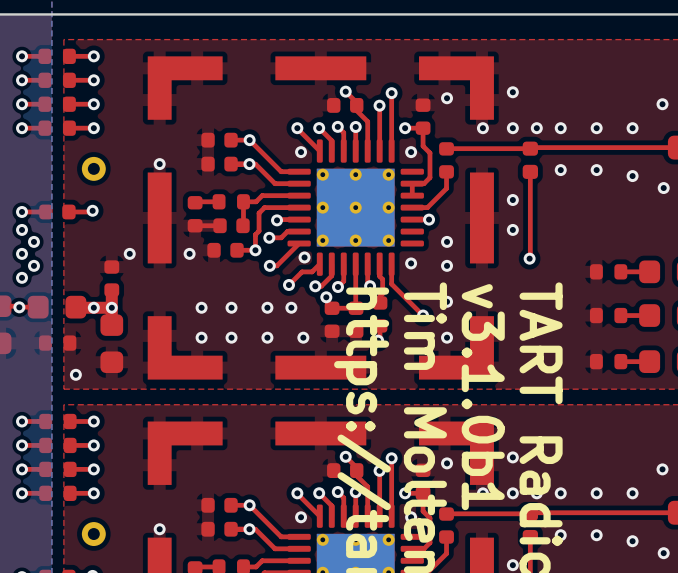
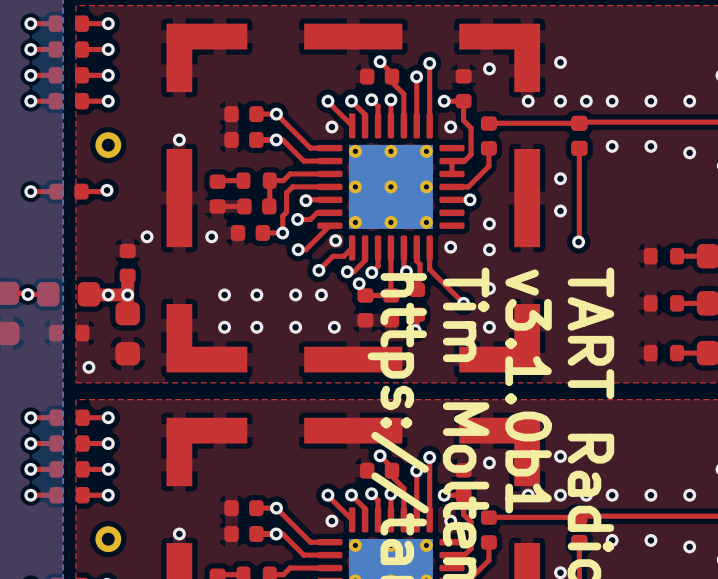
via: (22, 229) -> none
via: (33, 241) -> none
via: (22, 253) -> none
via: (33, 265) -> none
via: (22, 277) -> none

